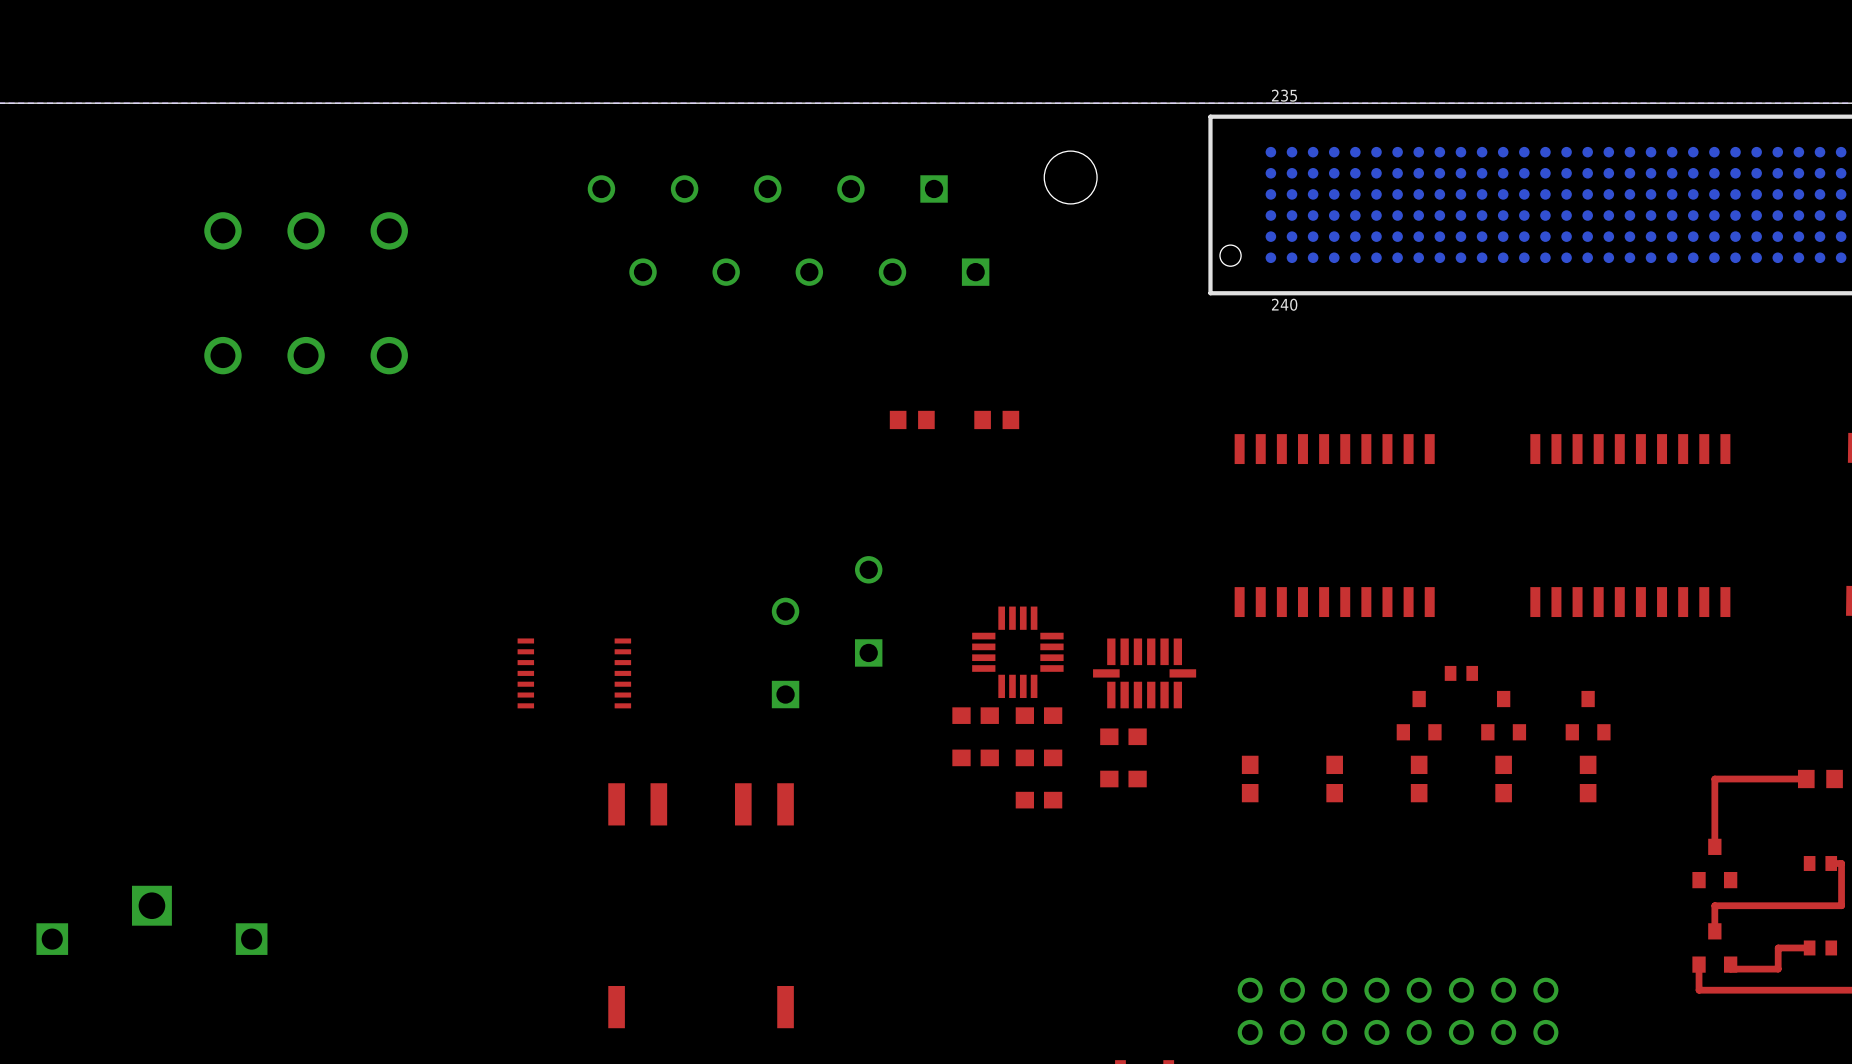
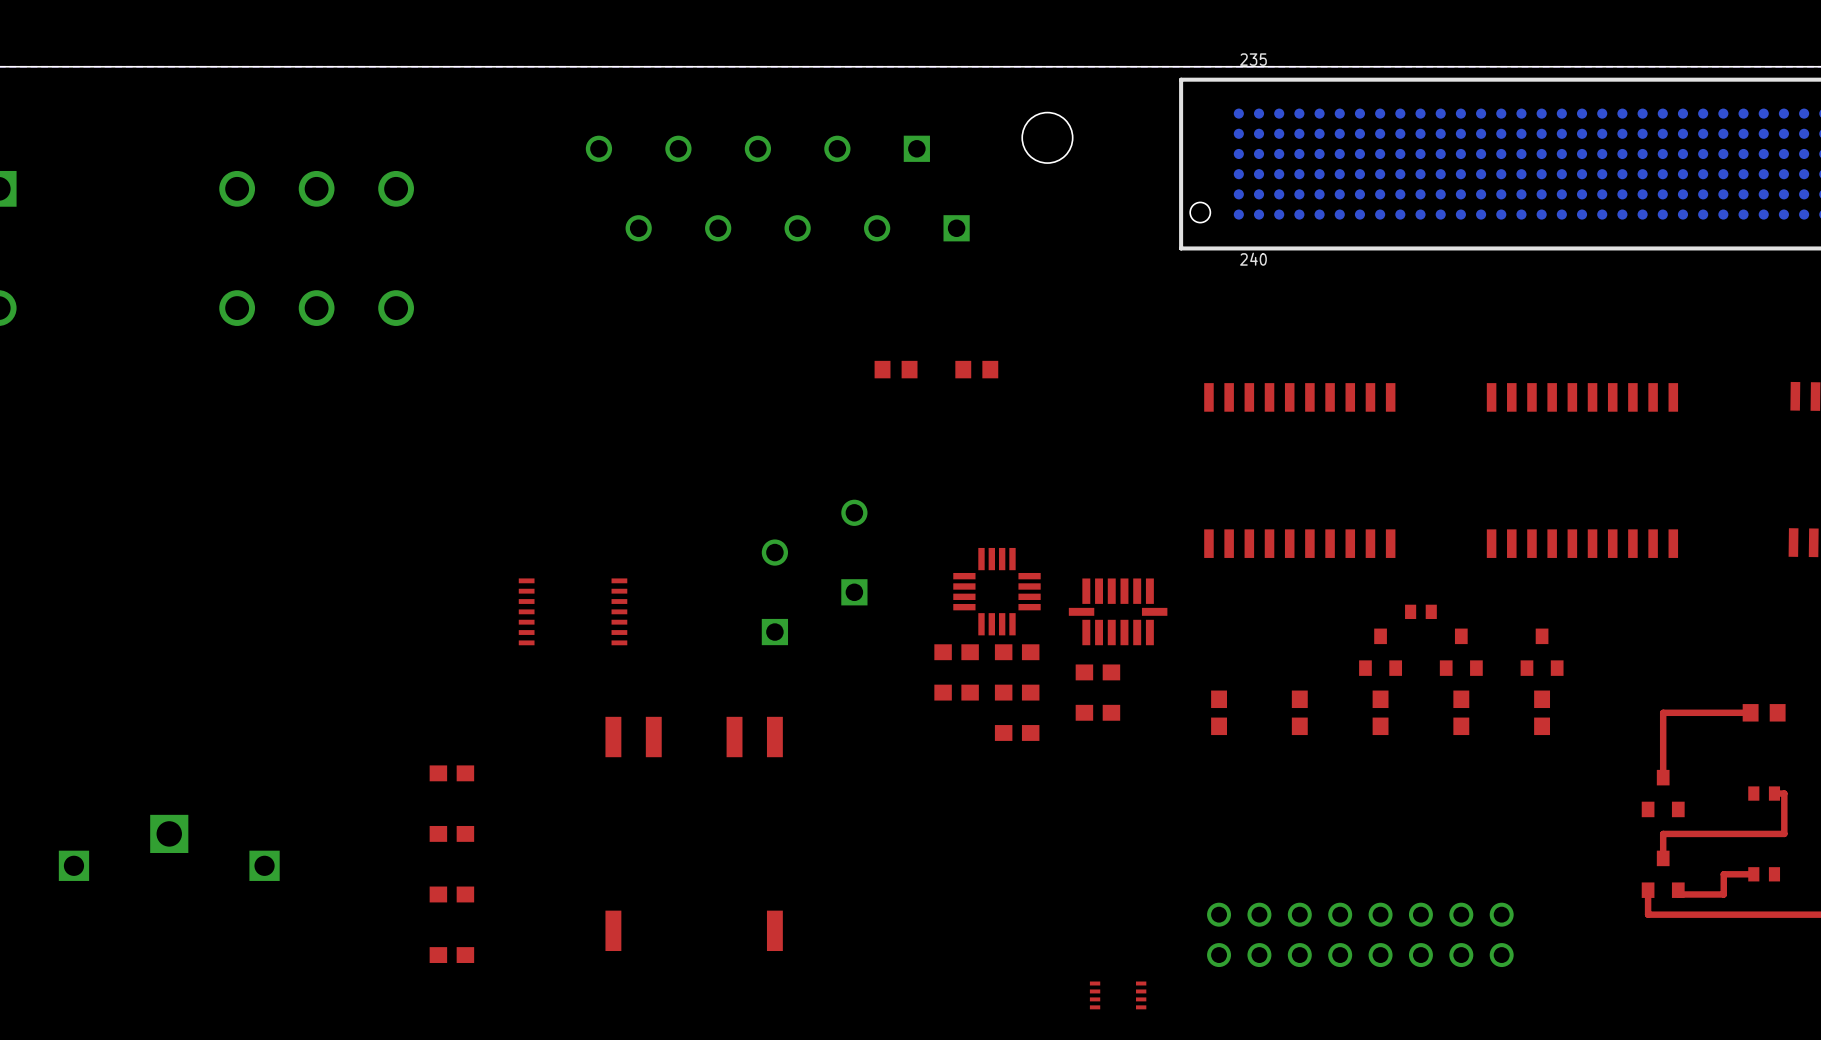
part: none -> (451, 773)
part: none -> (451, 833)
part: none -> (451, 894)
part: none -> (451, 955)

